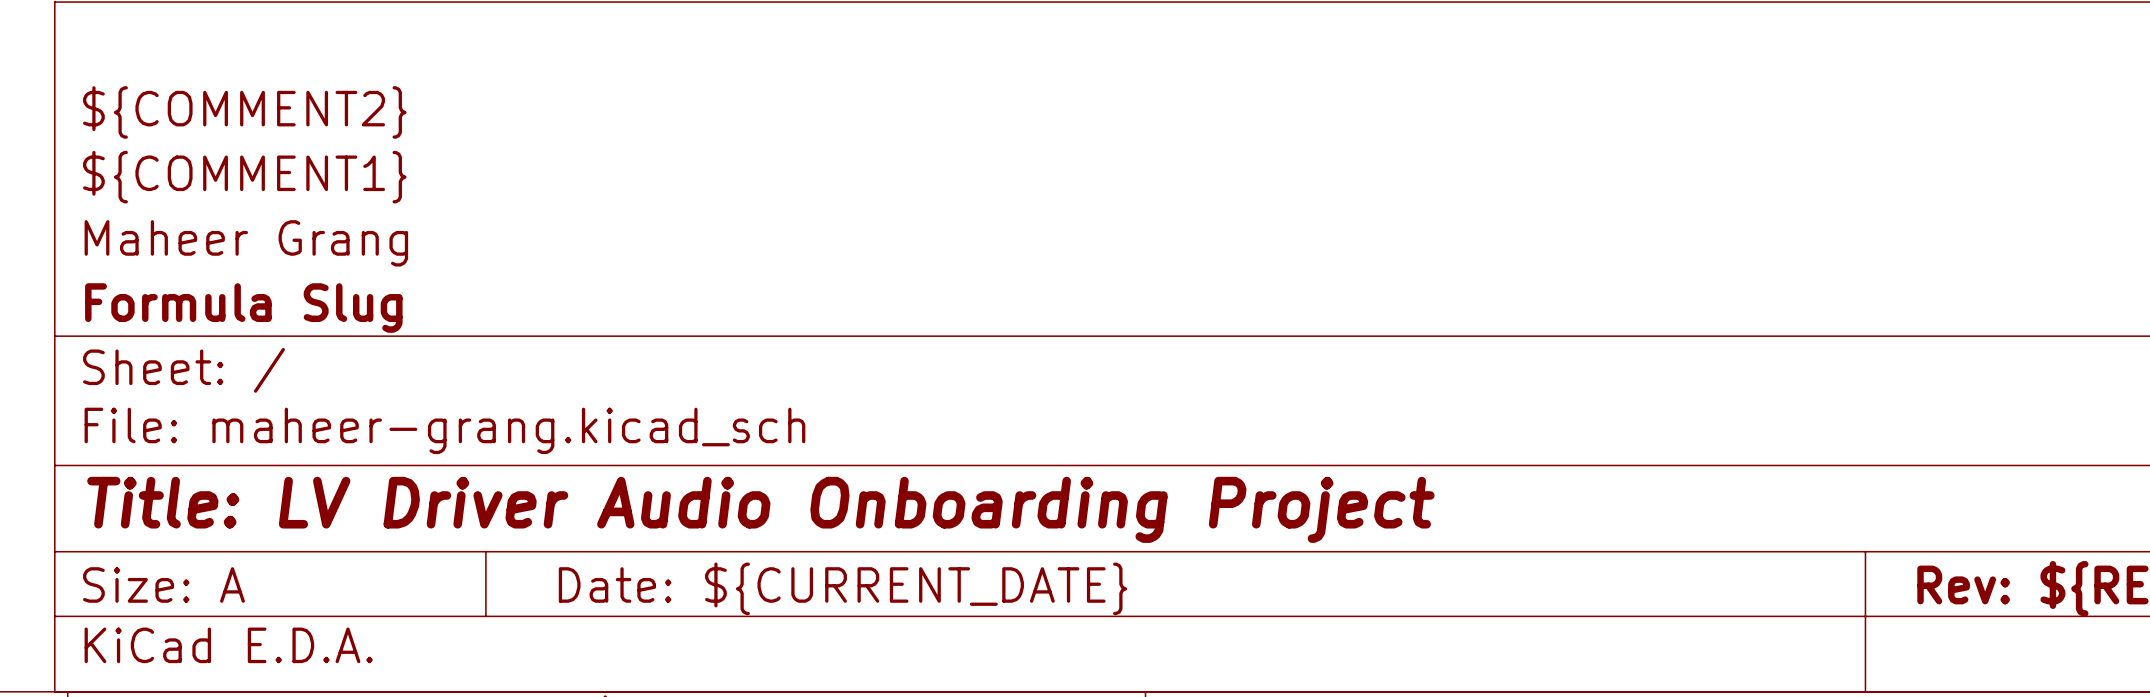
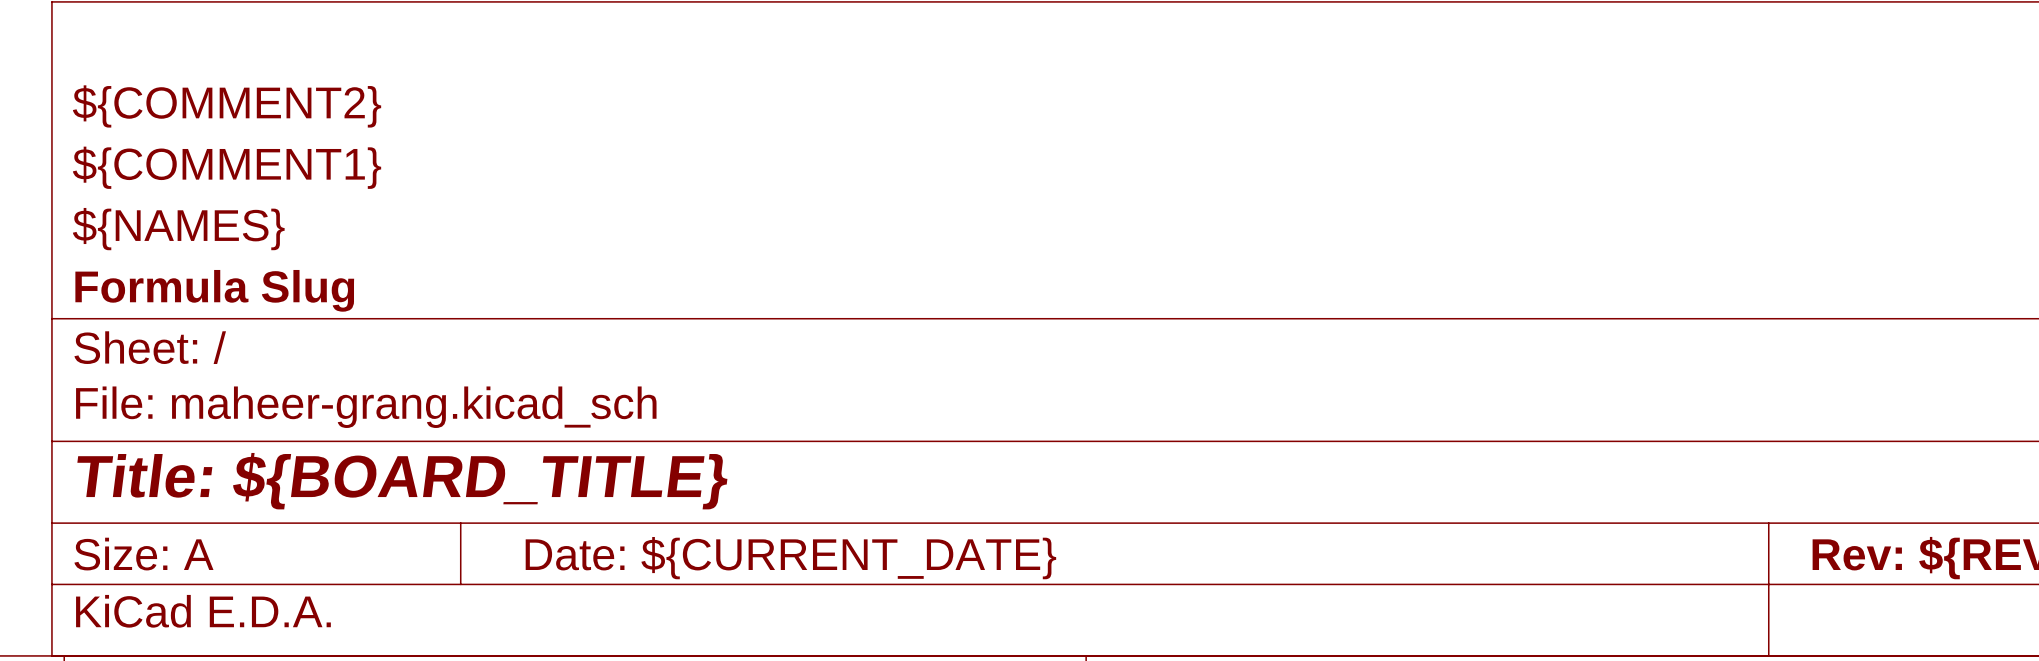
title block: Maheer Grang (246, 243) -> ${NAMES} (178, 229)
title block: Title: LV Driver Audio Onboarding Project (760, 509) -> Title: ${BOARD_TITLE} (402, 481)

